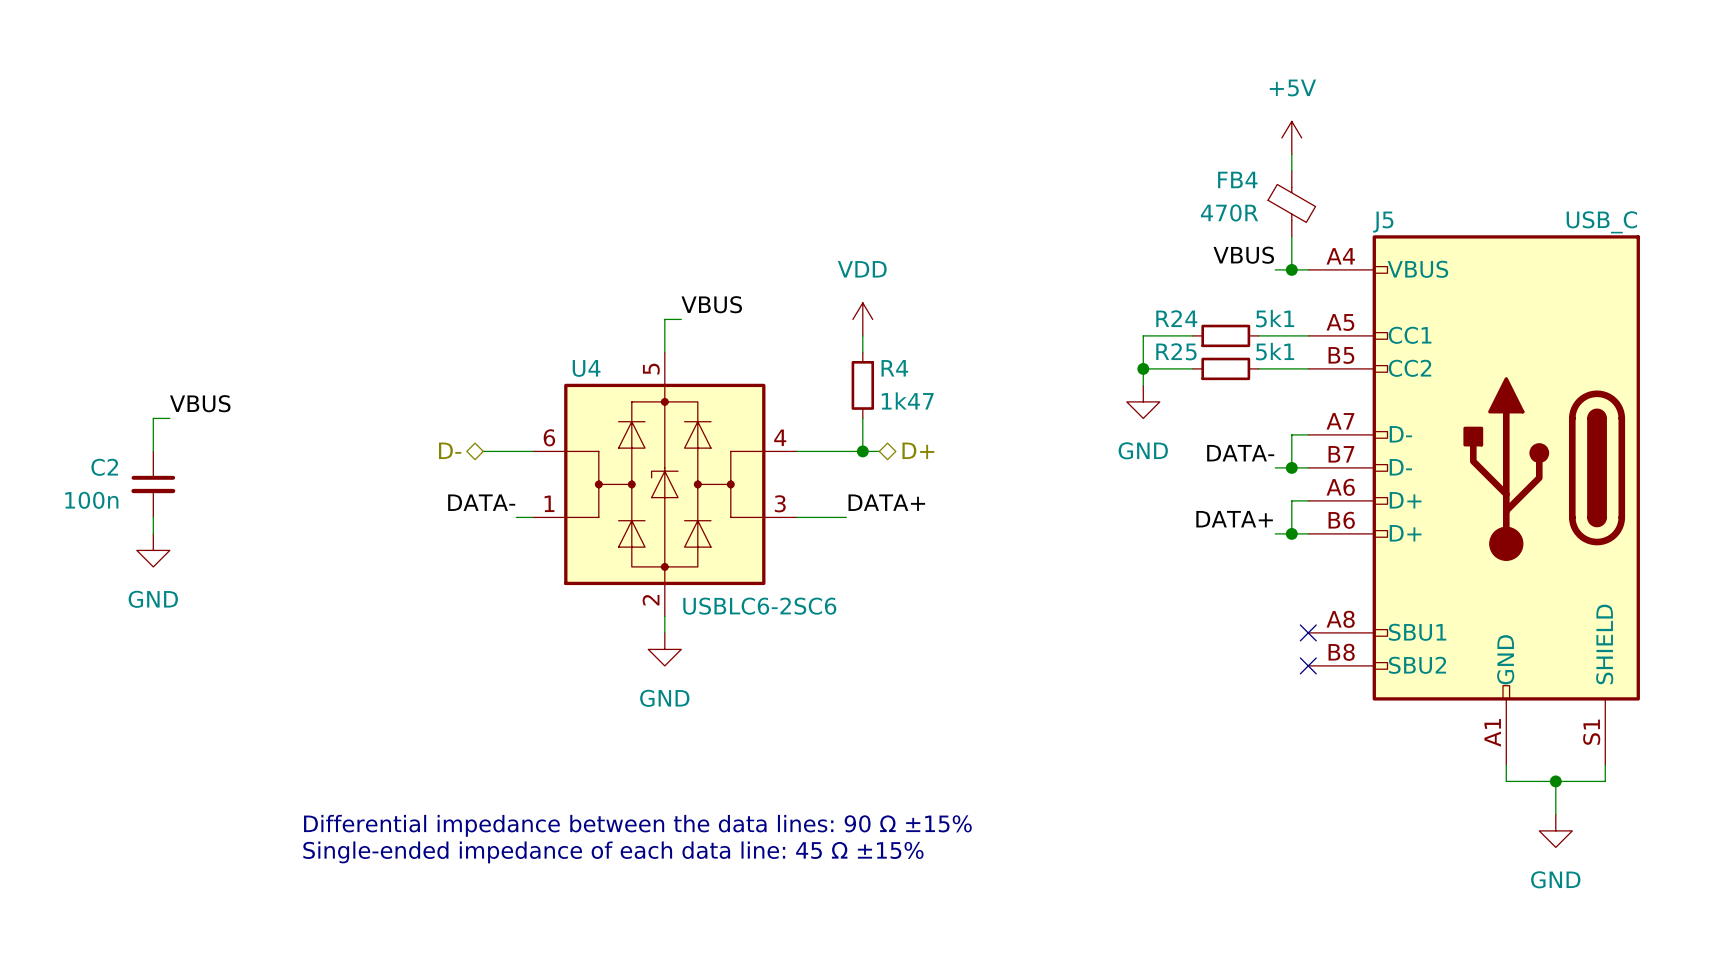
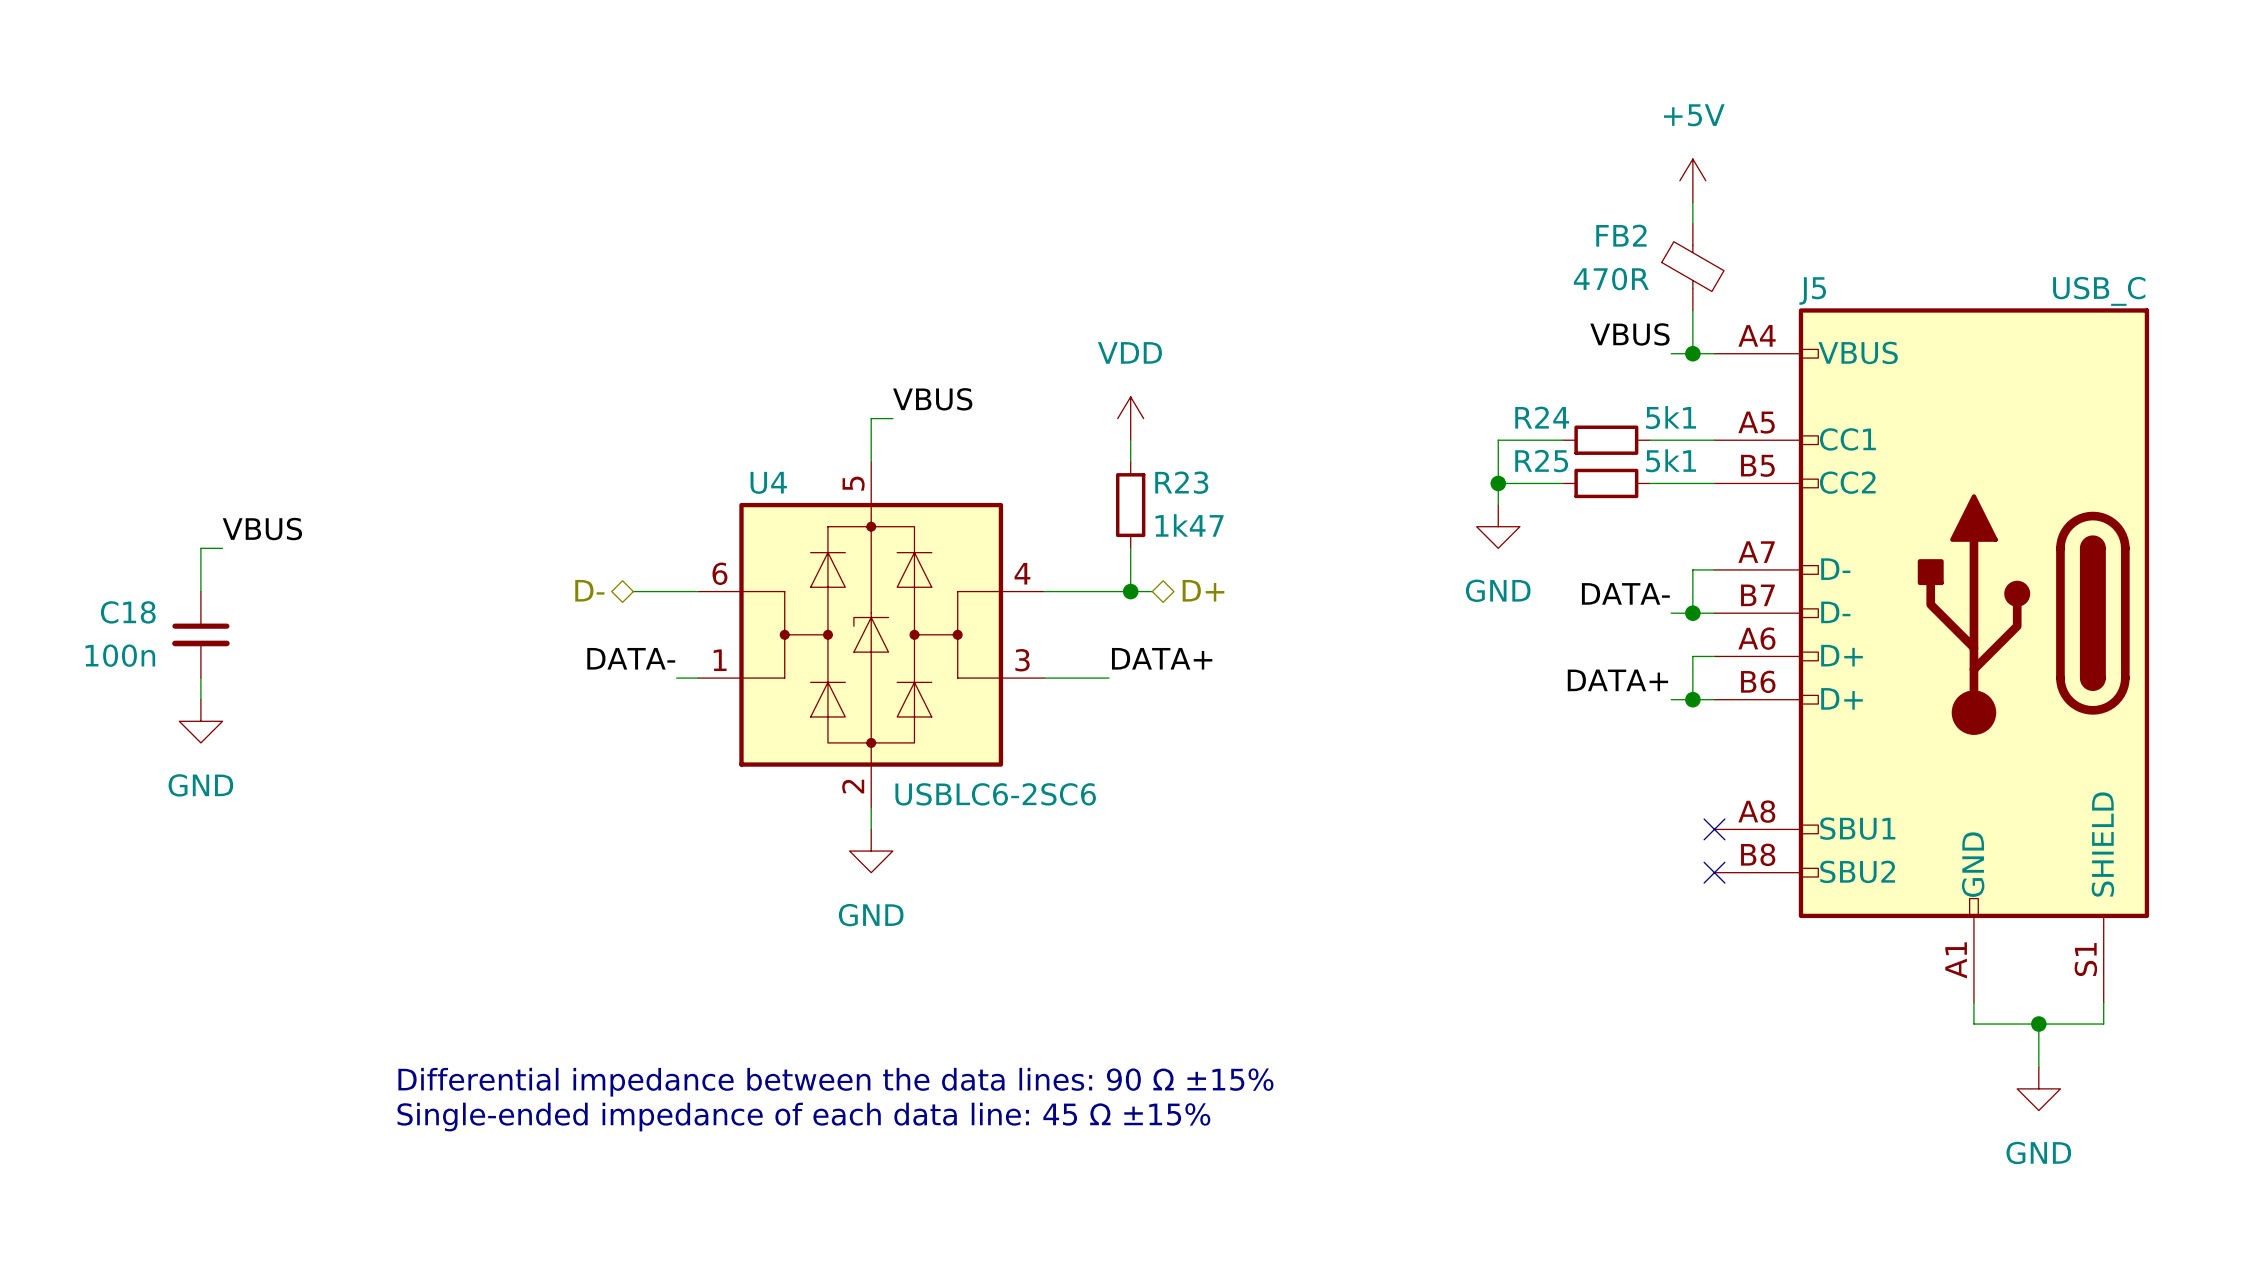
FB4 name: FB4 (1237, 179) -> FB2 (1621, 235)
R4 name: R4 (894, 368) -> R23 (1181, 482)
C2 name: C2 (104, 467) -> C18 (128, 612)

